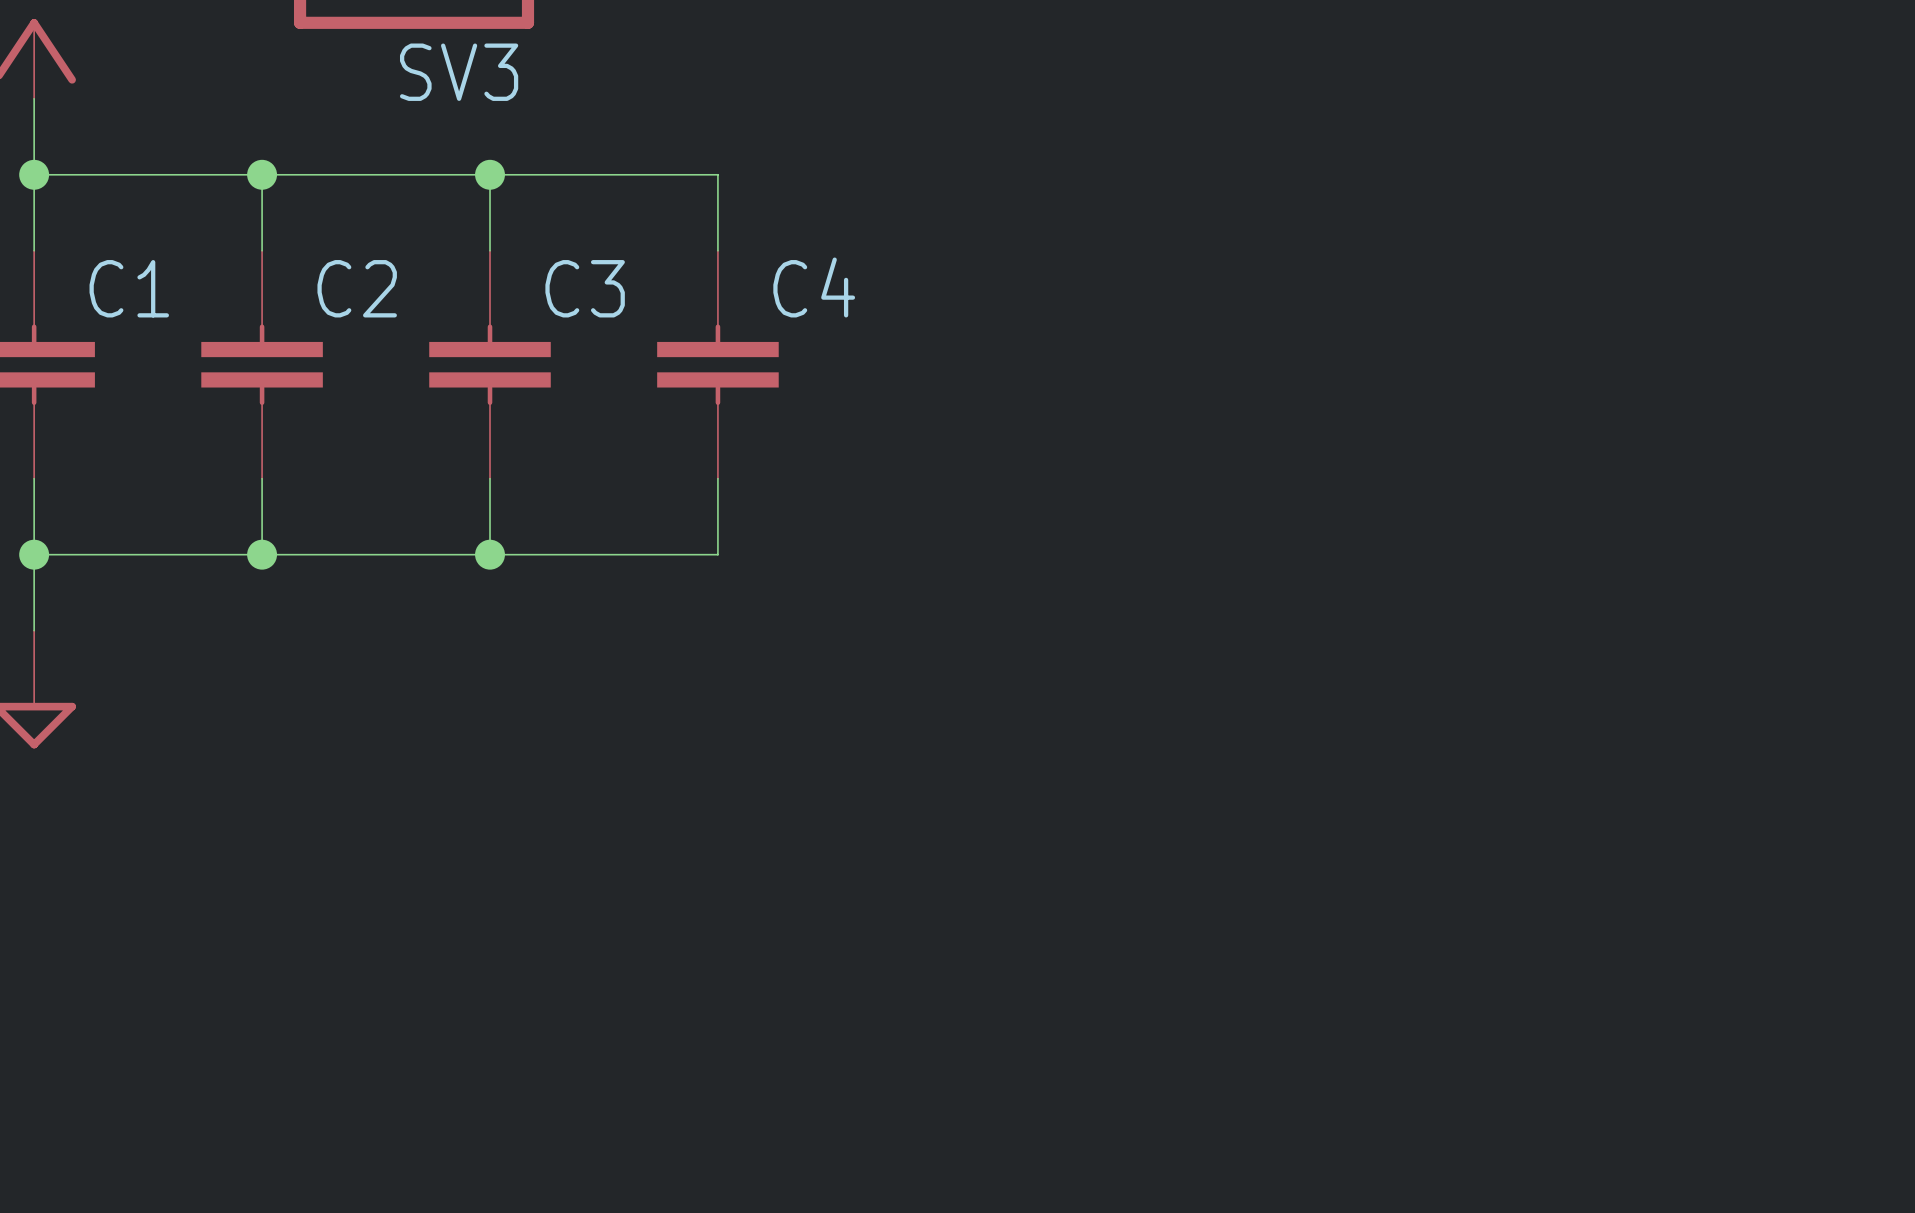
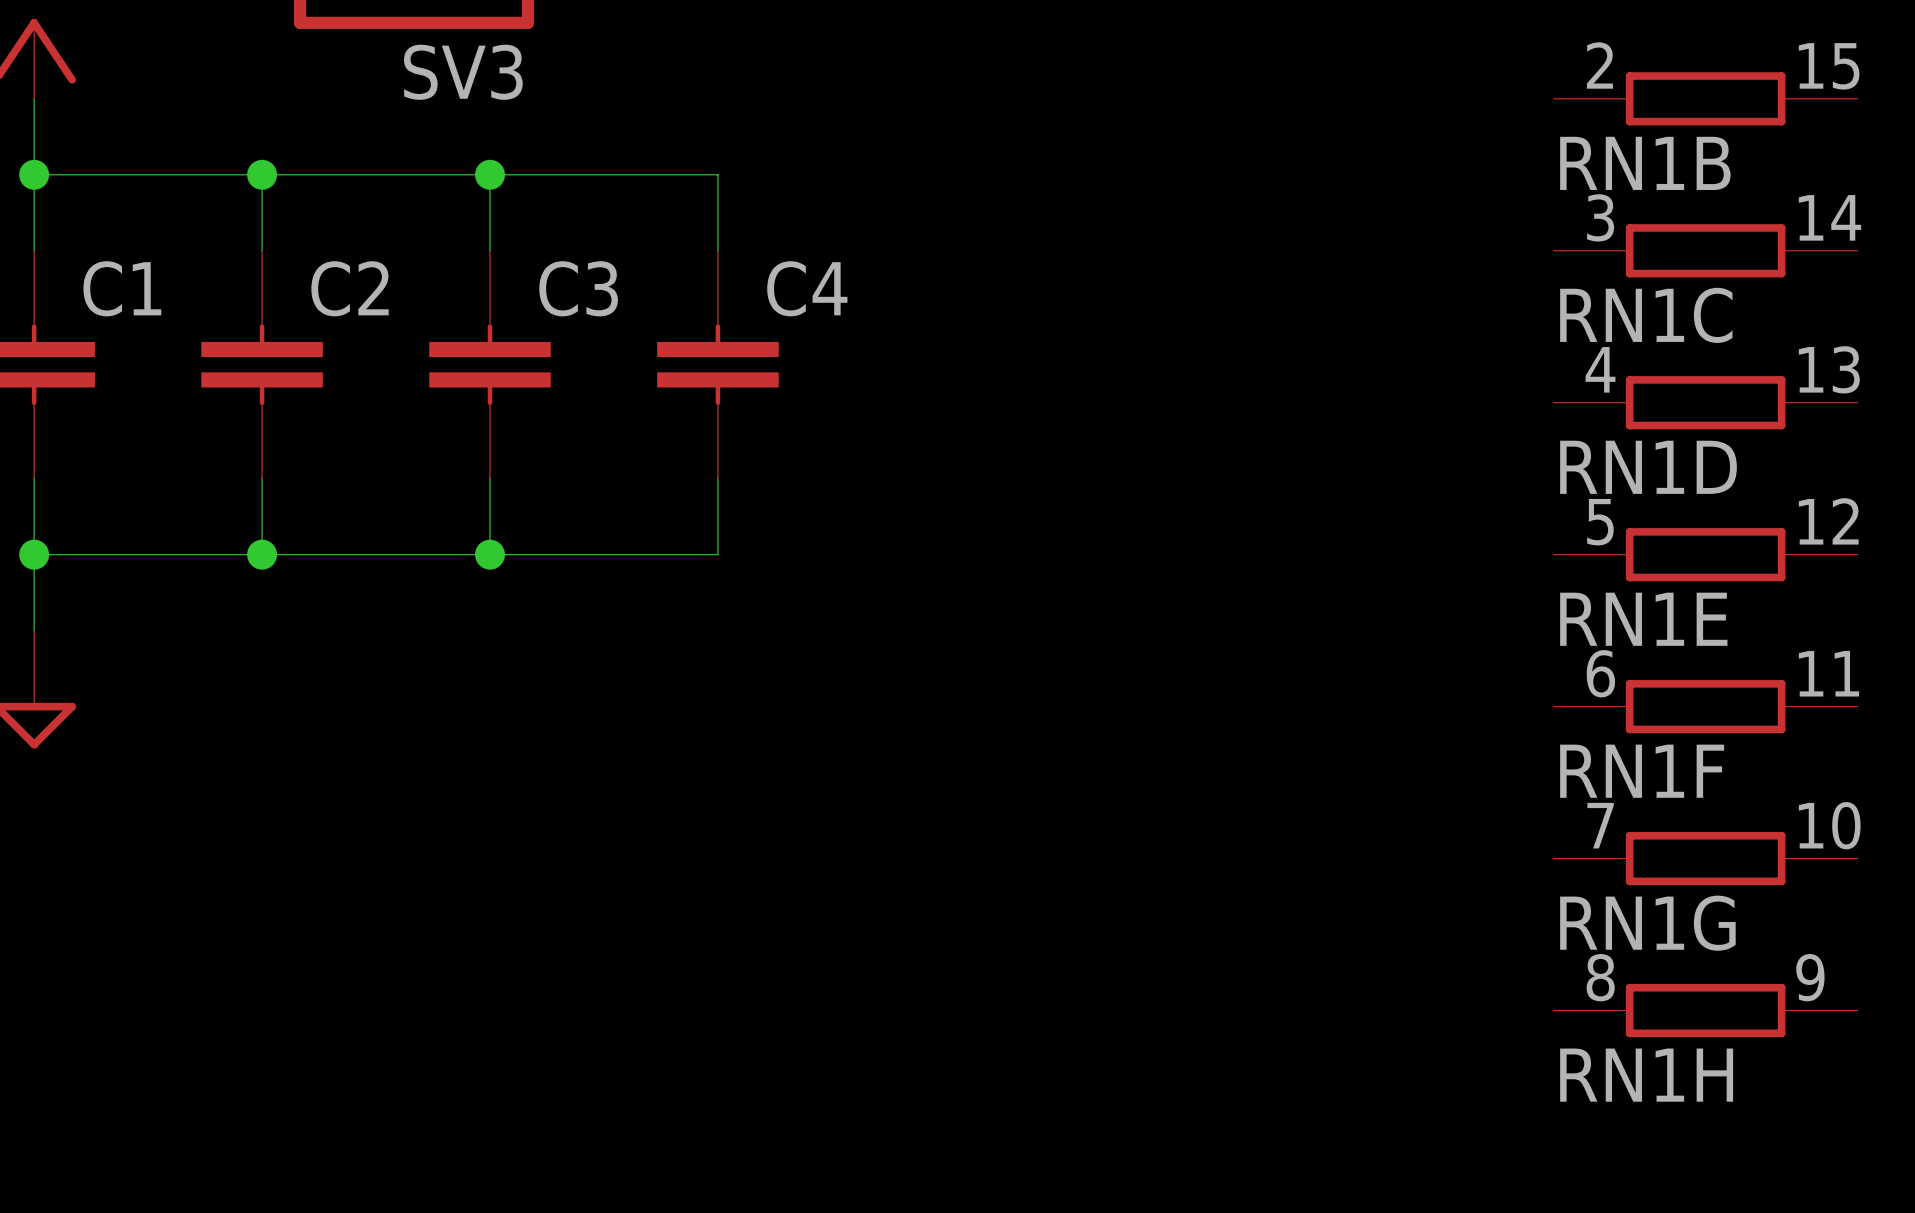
RN1B: none -> (1705, 98)
RN1C: none -> (1705, 250)
RN1D: none -> (1705, 402)
RN1E: none -> (1705, 554)
RN1F: none -> (1705, 706)
RN1G: none -> (1705, 858)
RN1H: none -> (1705, 1010)

